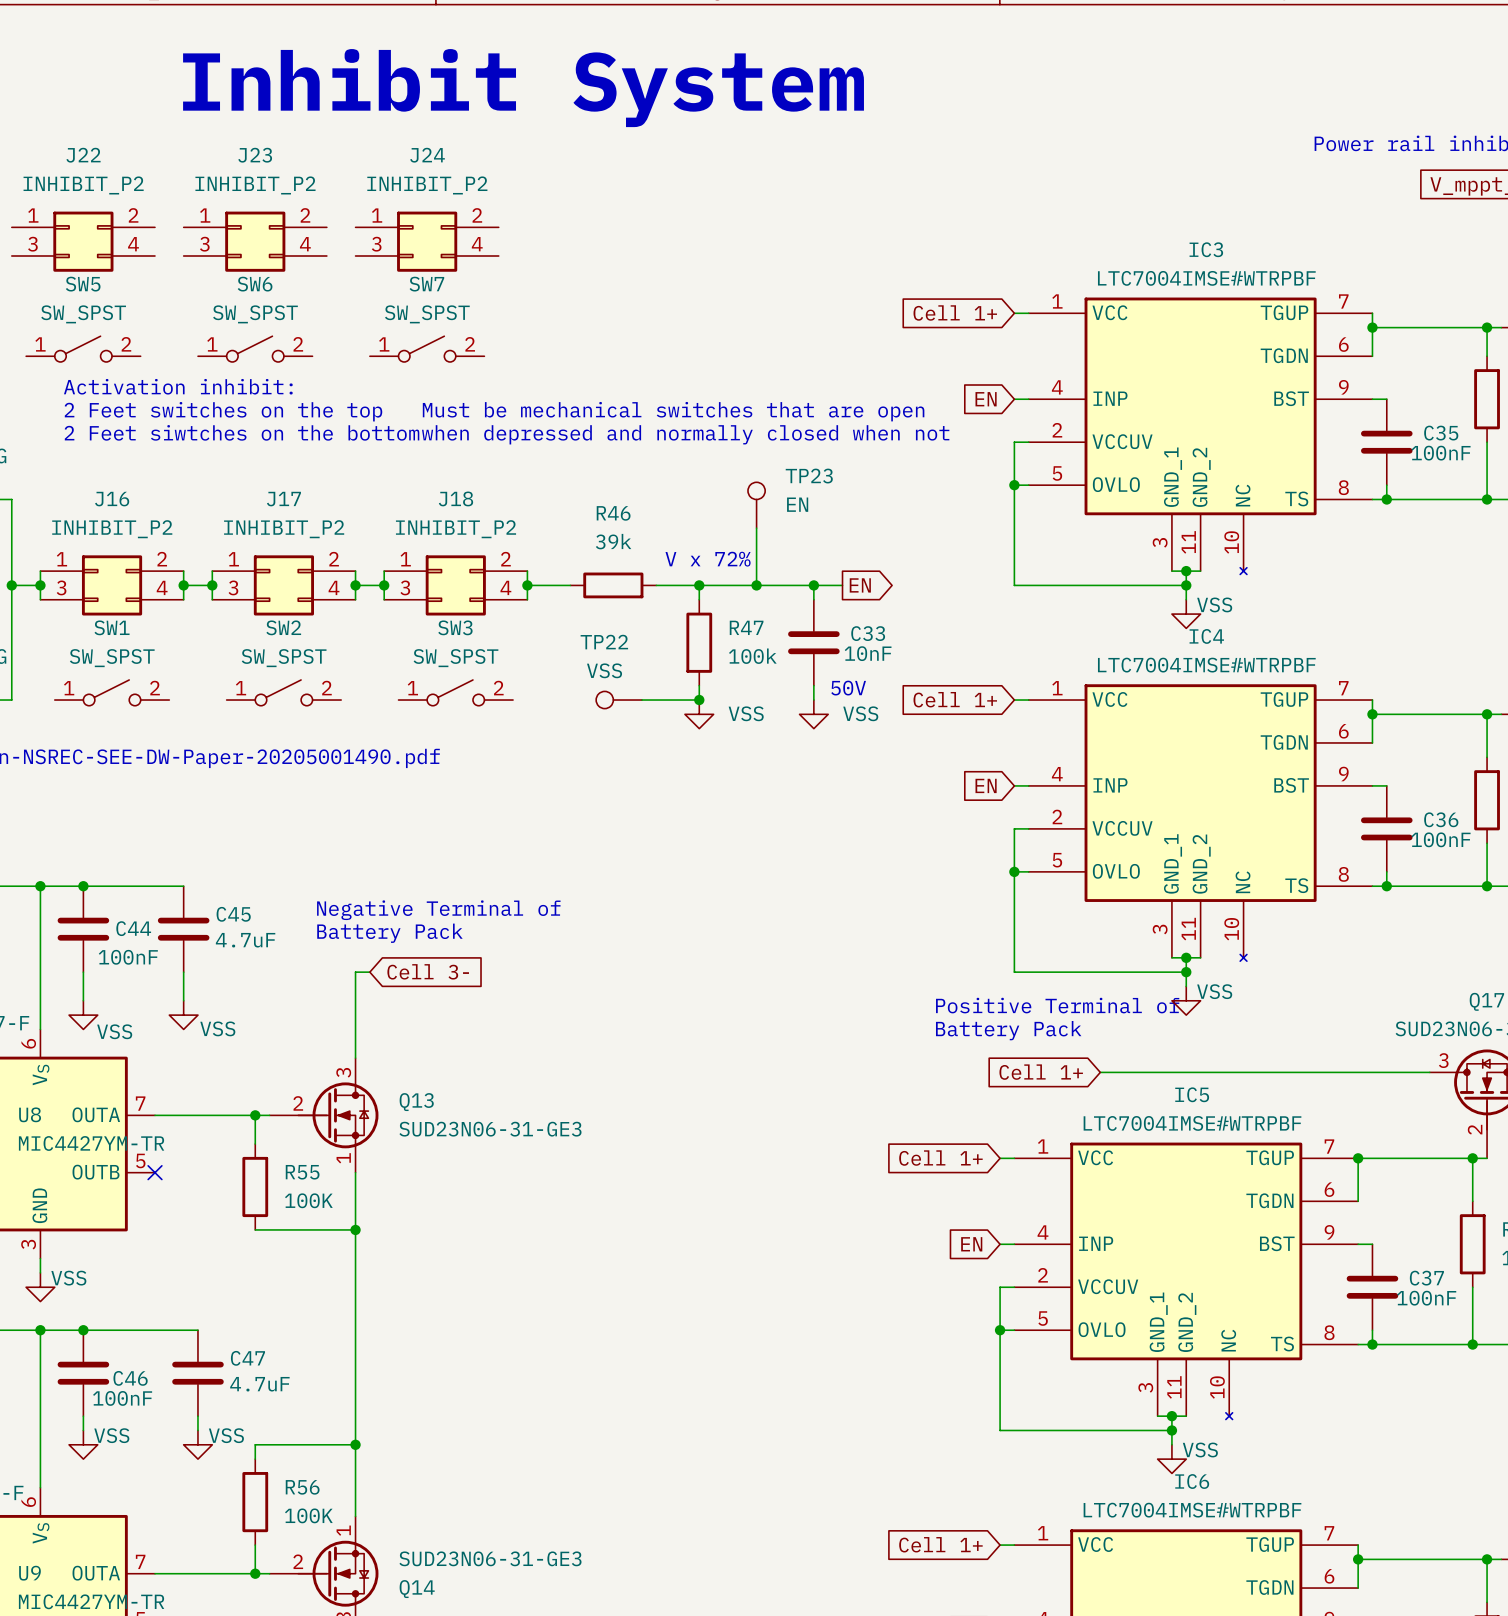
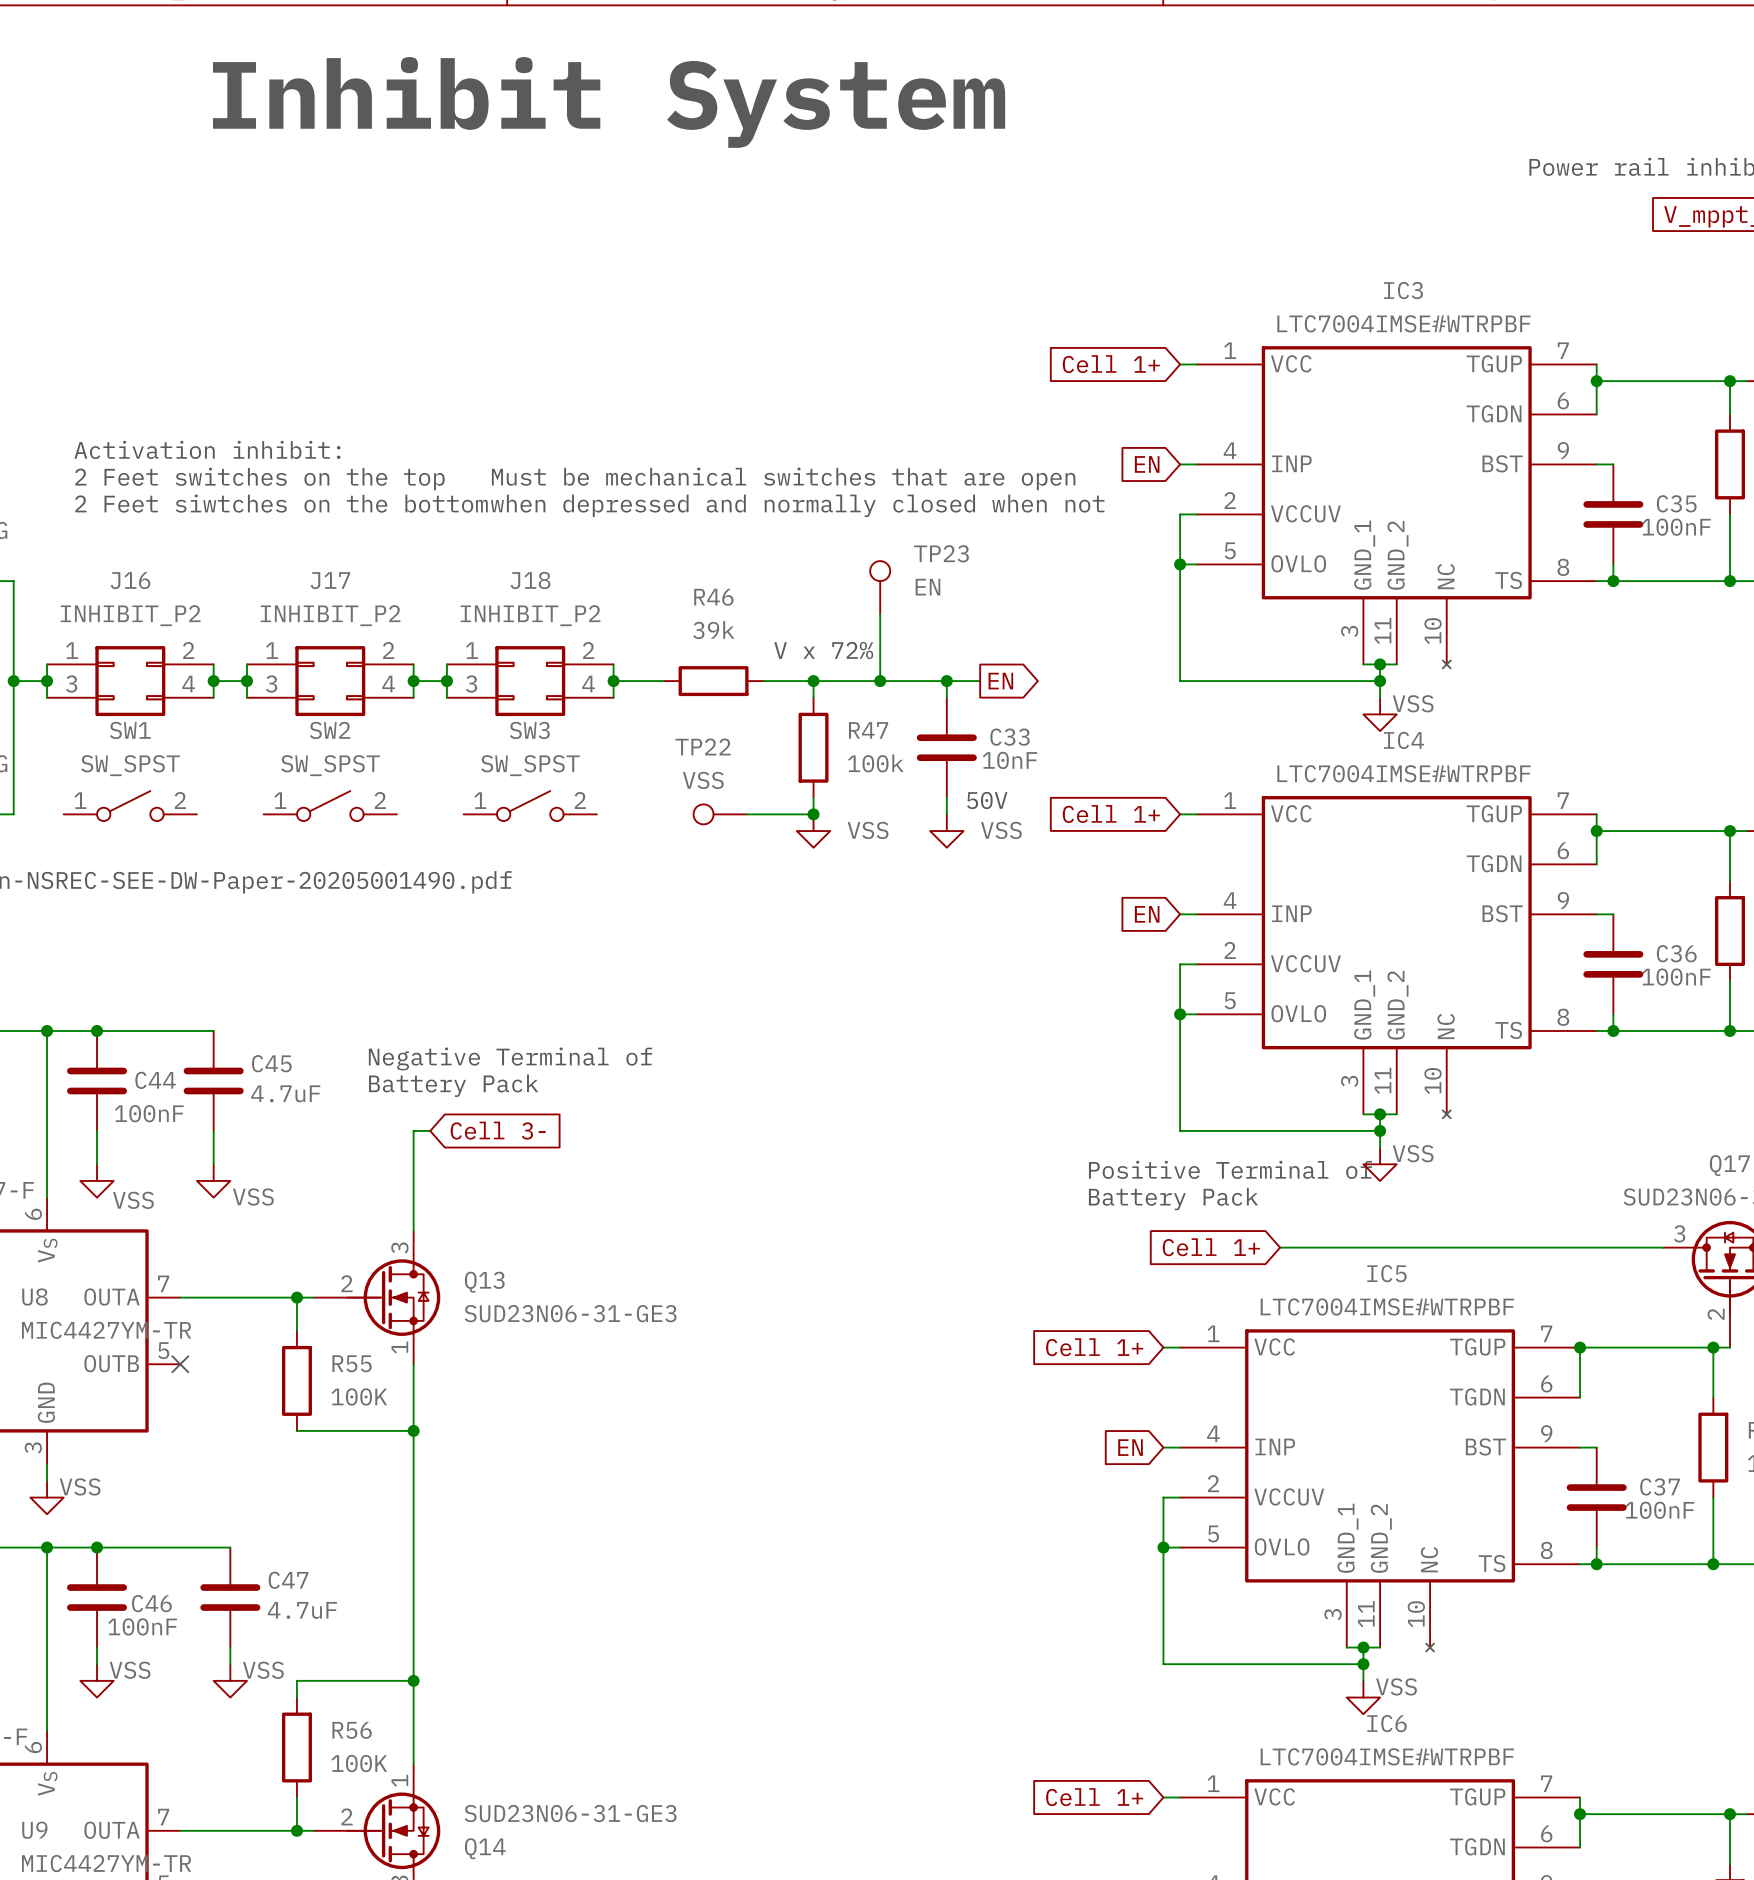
J22: INHIBIT_P2 (83, 241) -> none
J23: INHIBIT_P2 (255, 241) -> none
J24: INHIBIT_P2 (427, 241) -> none
SW5: SW_SPST (83, 349) -> none
SW6: SW_SPST (255, 349) -> none
SW7: SW_SPST (427, 349) -> none

